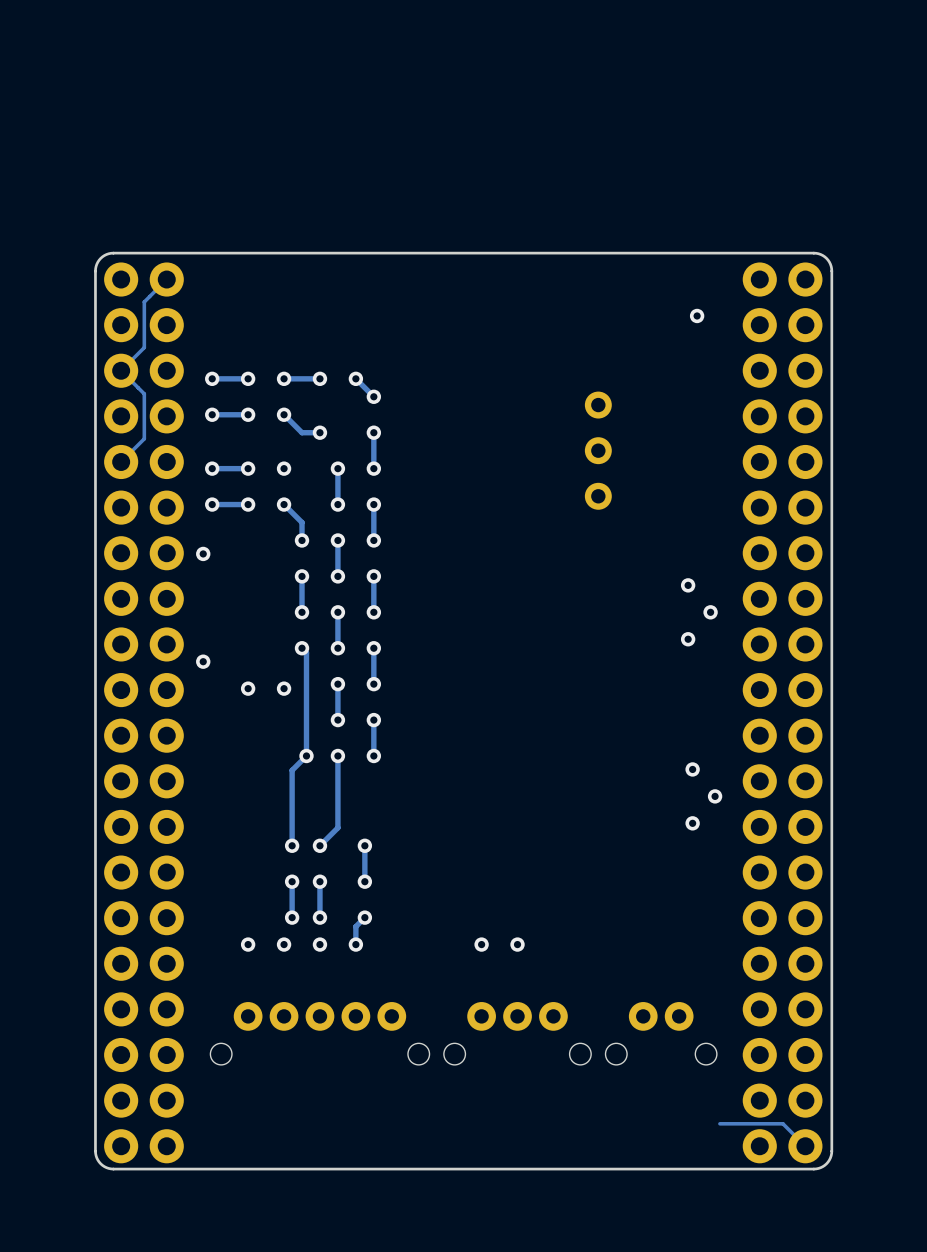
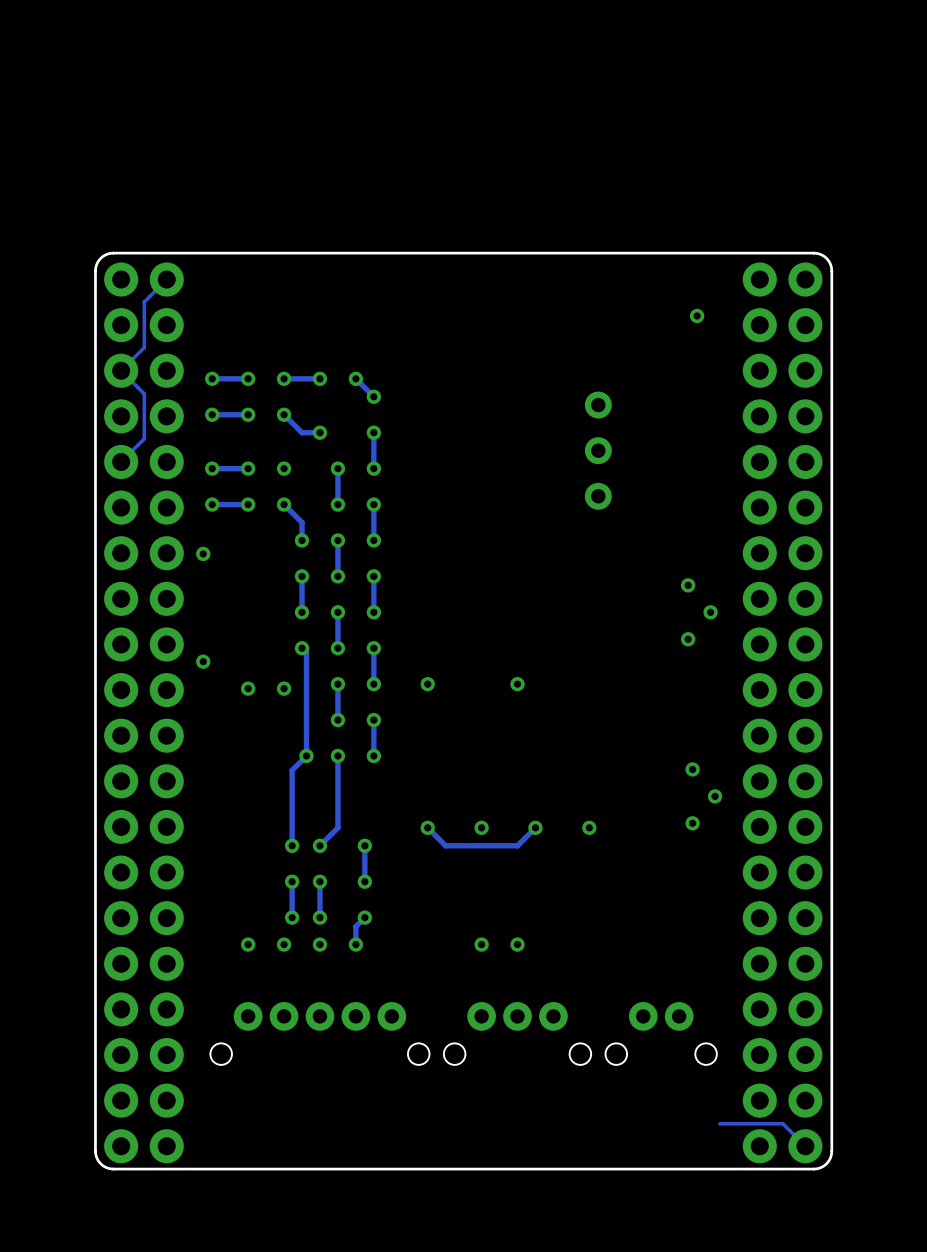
via: none -> (427, 684)
via: none -> (517, 684)
via: none -> (427, 827)
via: none -> (481, 827)
track: none -> (535, 827) (517, 845) (445, 845) (427, 827)
via: none -> (535, 827)
via: none -> (589, 827)

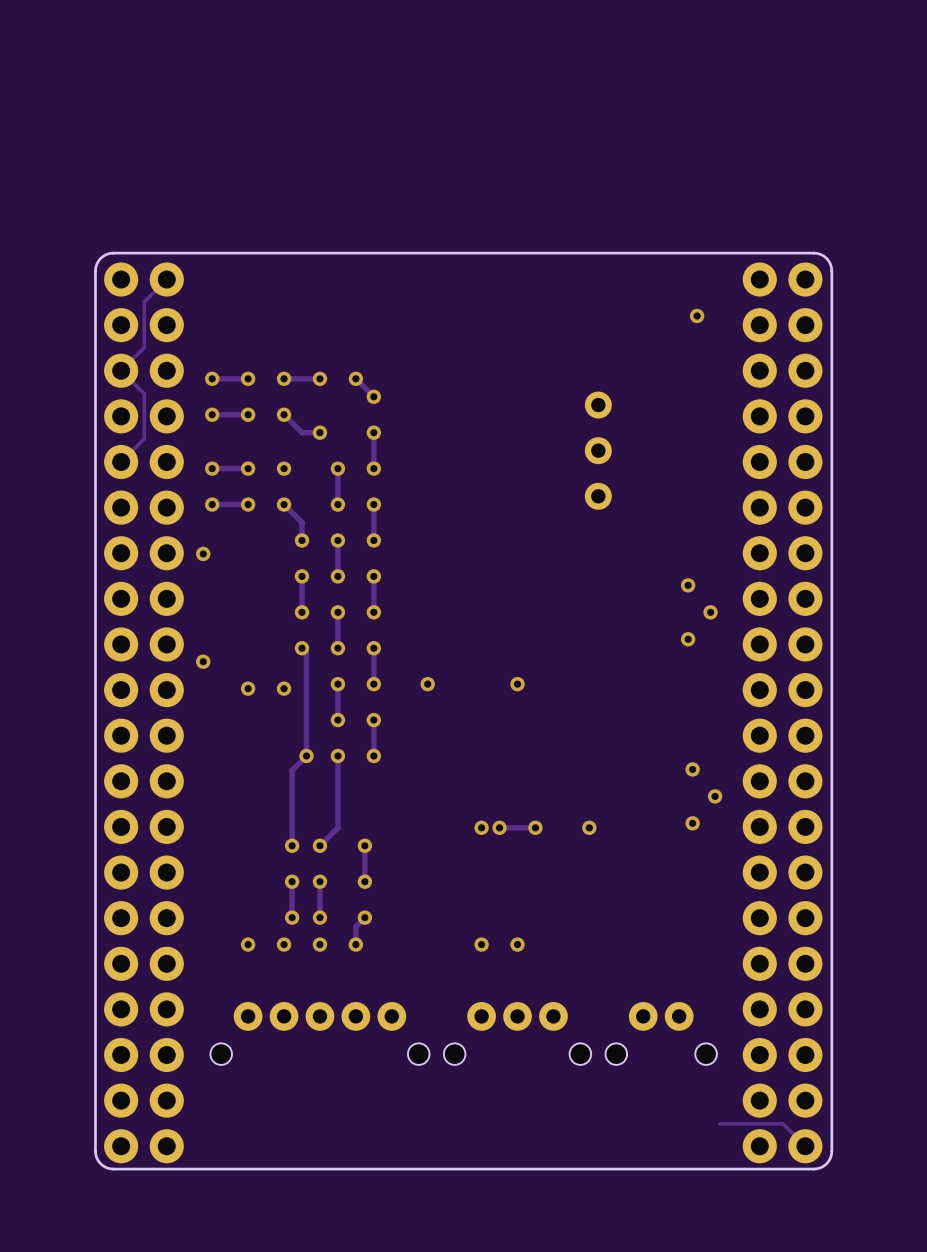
via position: (427, 827) -> (499, 827)
track: (535, 827) (517, 845) (445, 845) (427, 827) -> (535, 827) (499, 827)

